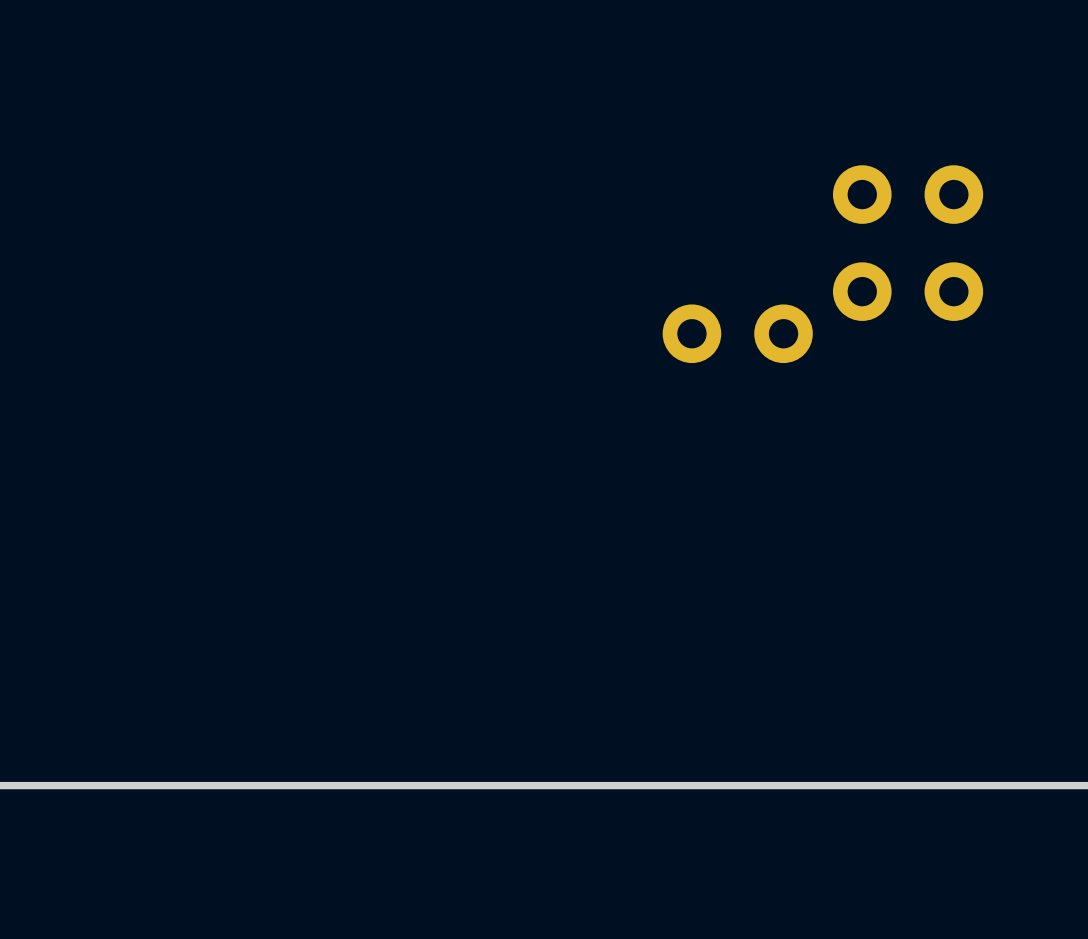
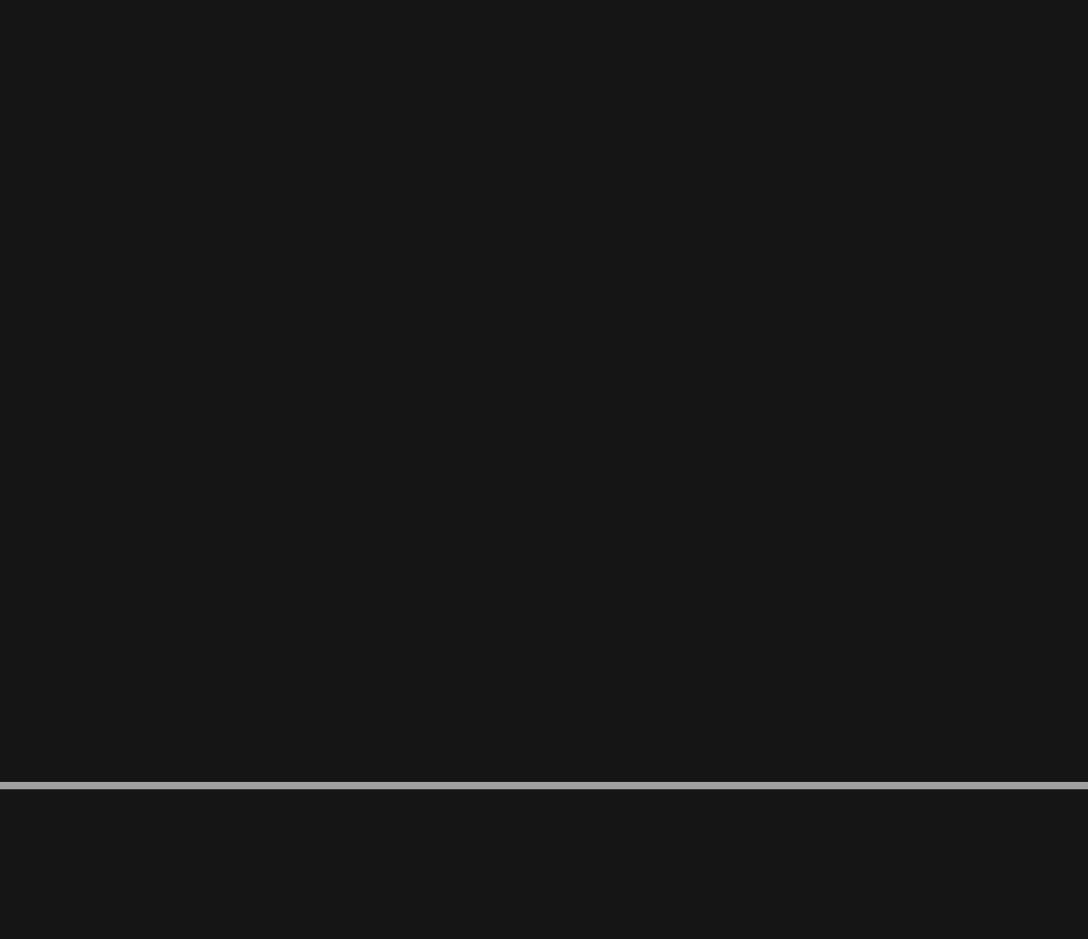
part: (908, 194) -> none
part: (908, 291) -> none
part: (737, 333) -> none

